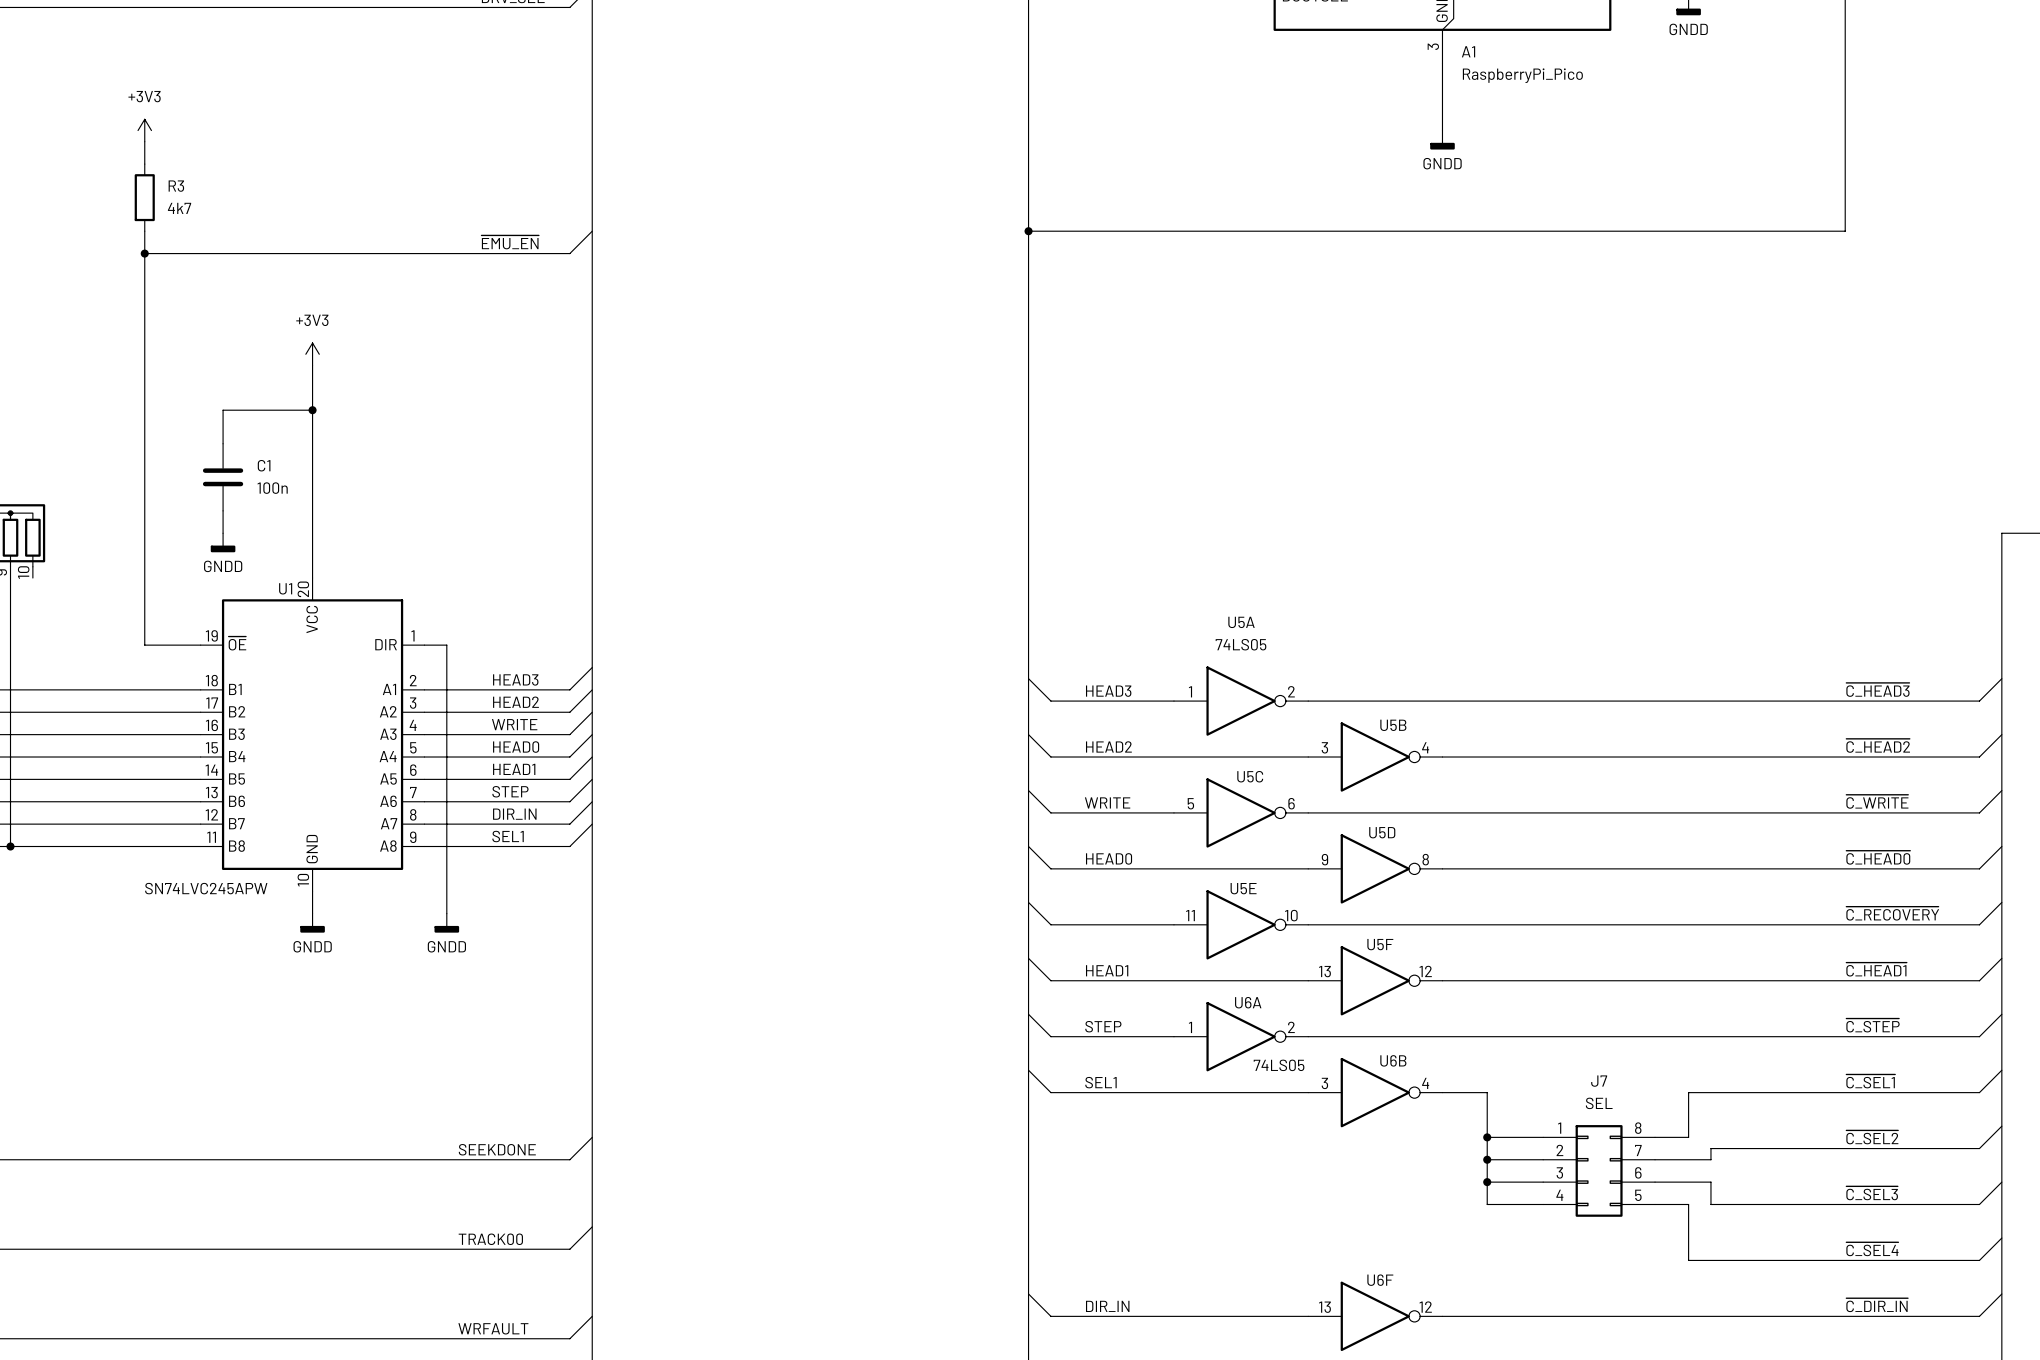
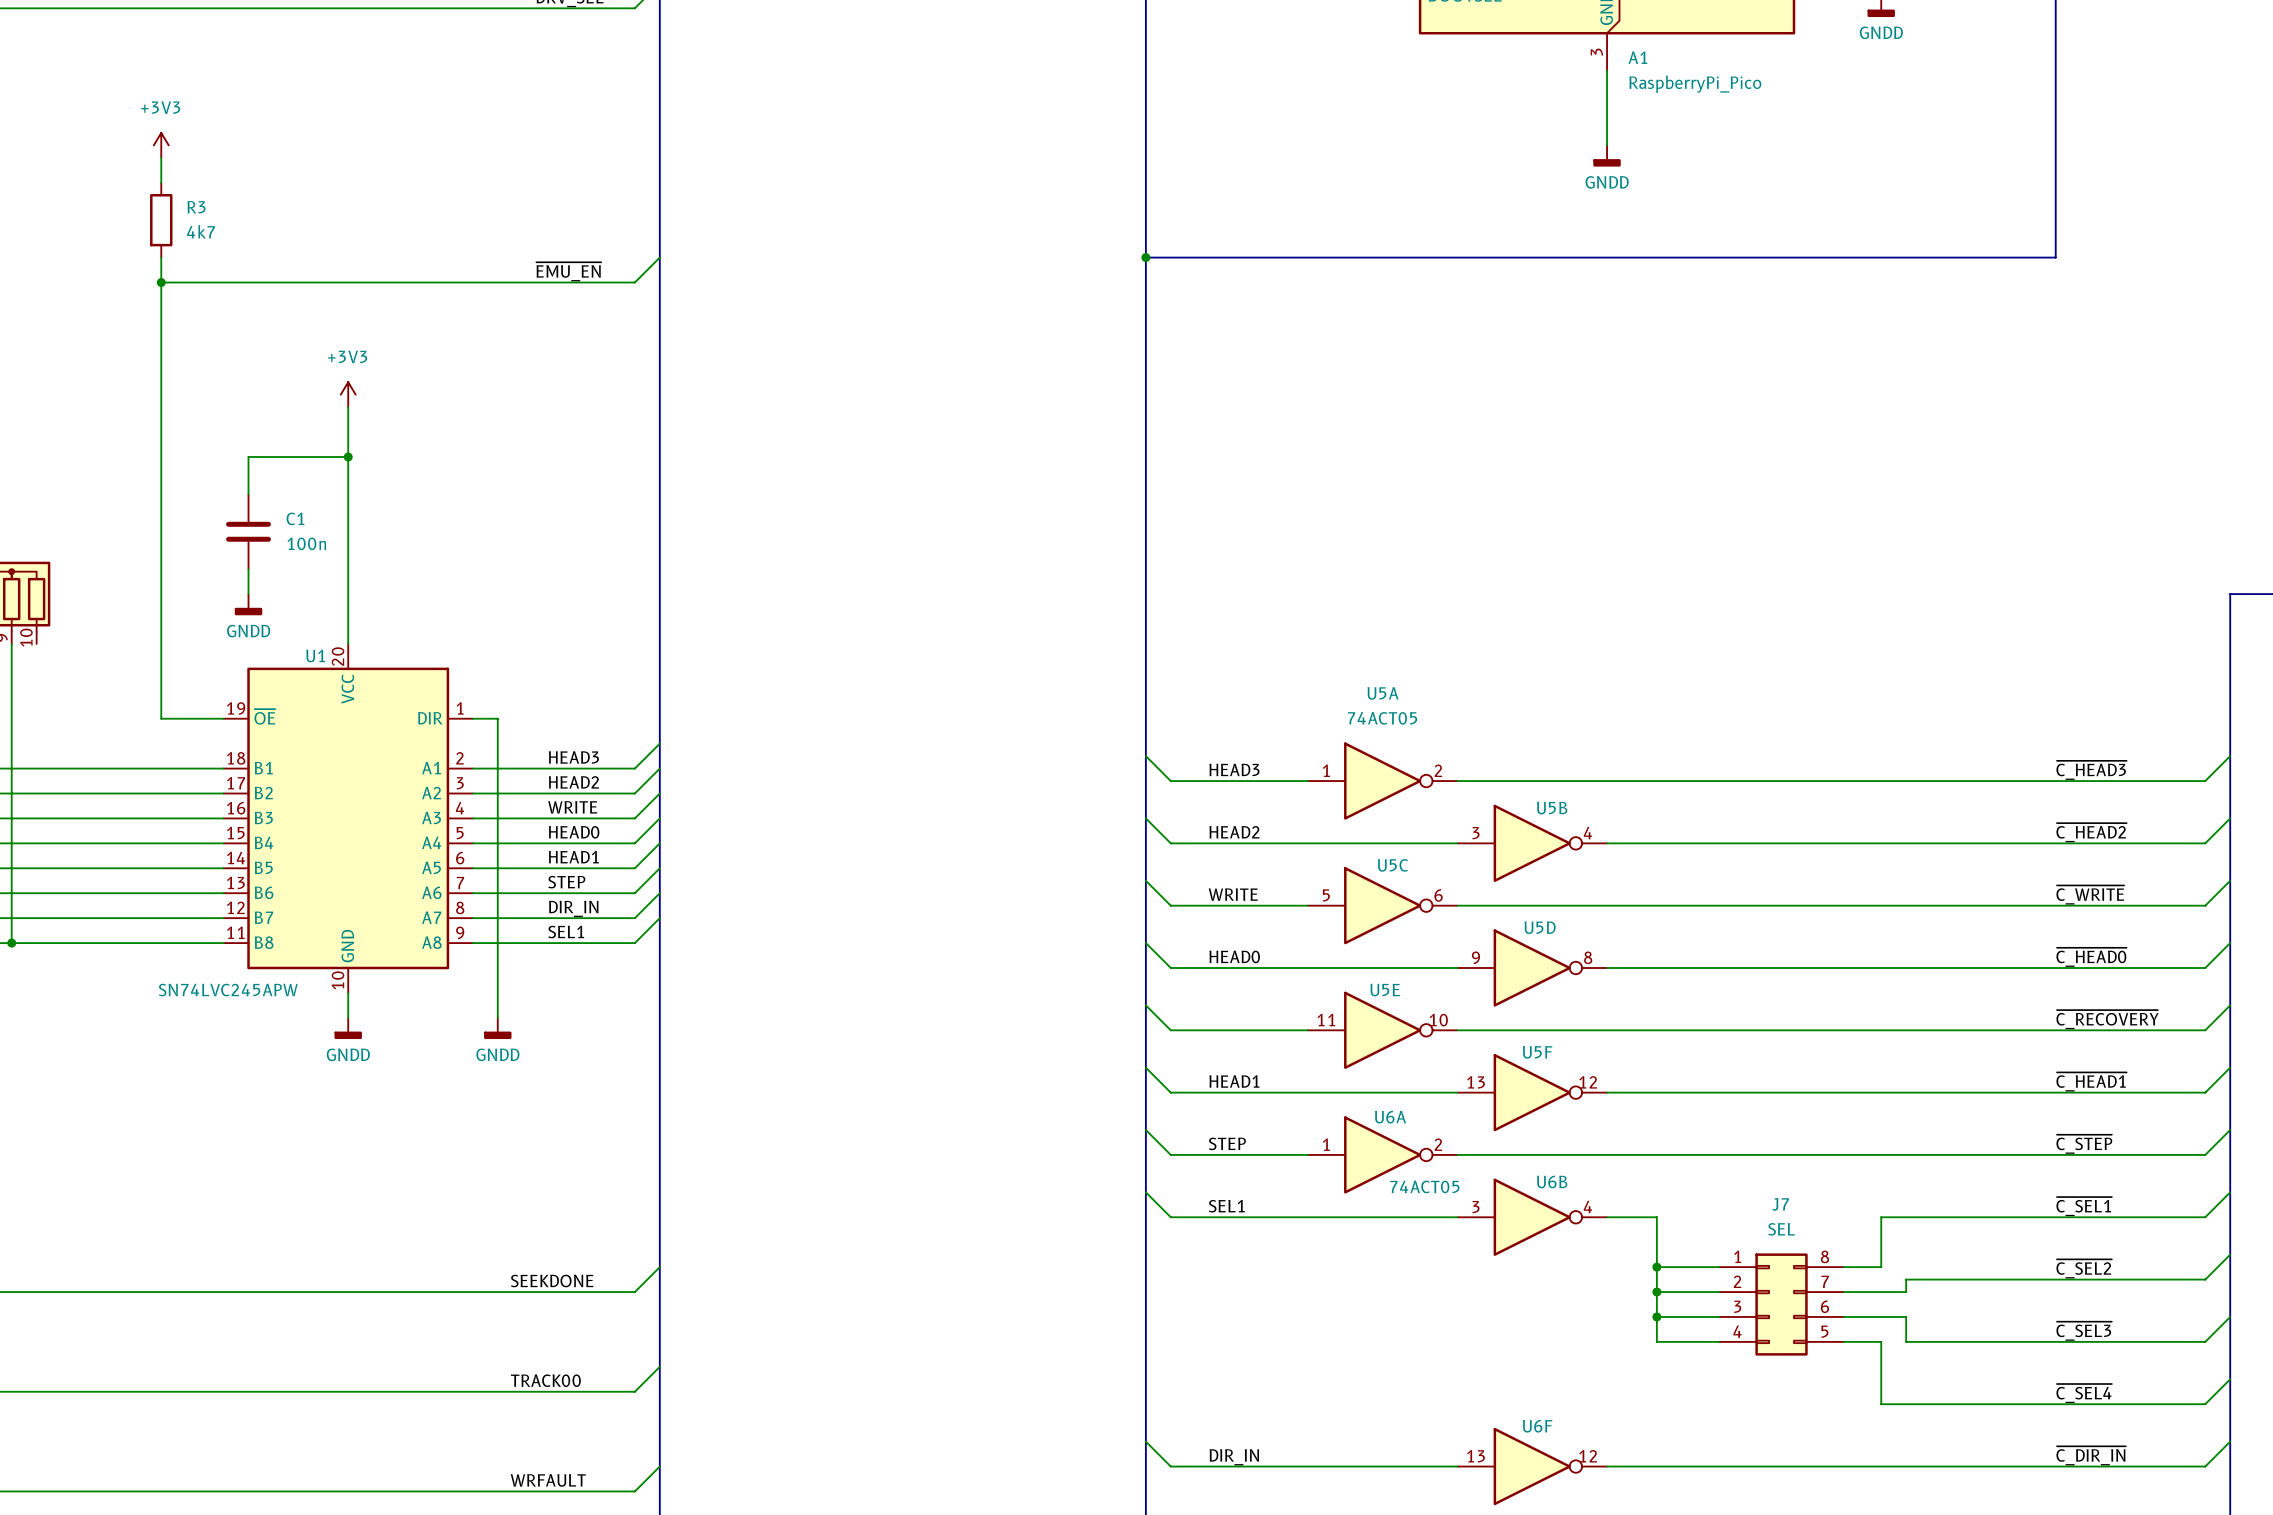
U5A value: 74LS05 (1240, 644) -> 74ACT05 (1382, 718)
U6A value: 74LS05 (1279, 1065) -> 74ACT05 (1424, 1186)

